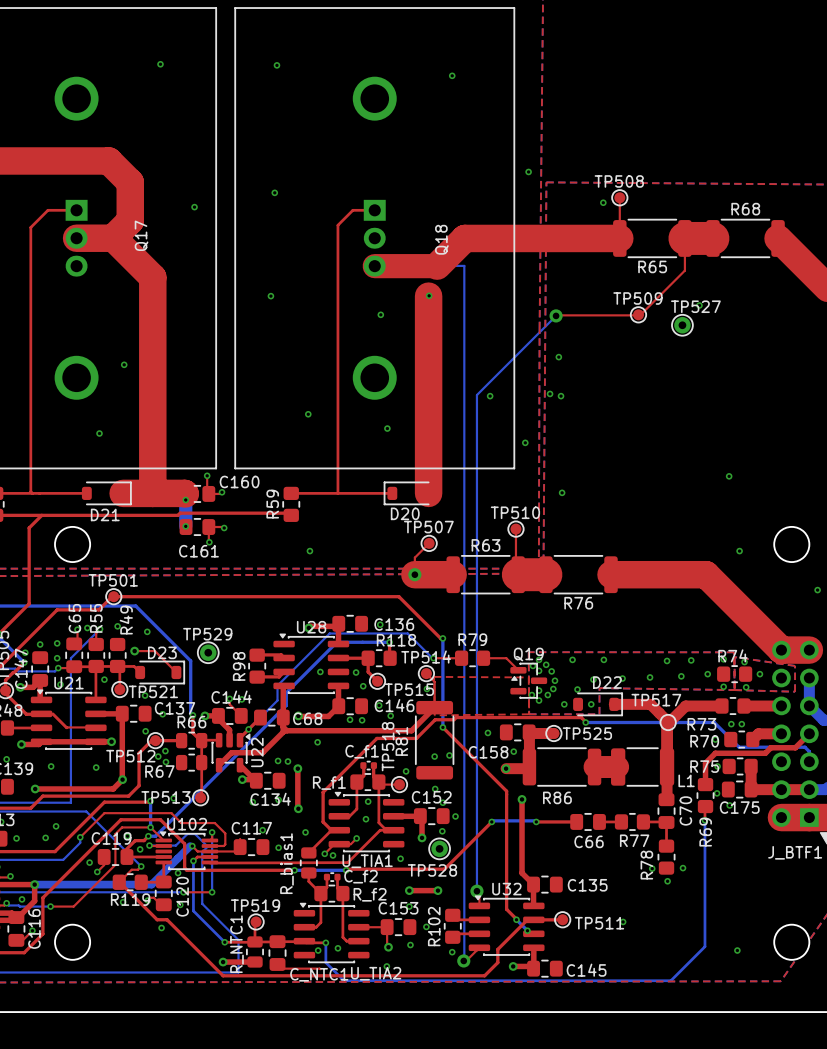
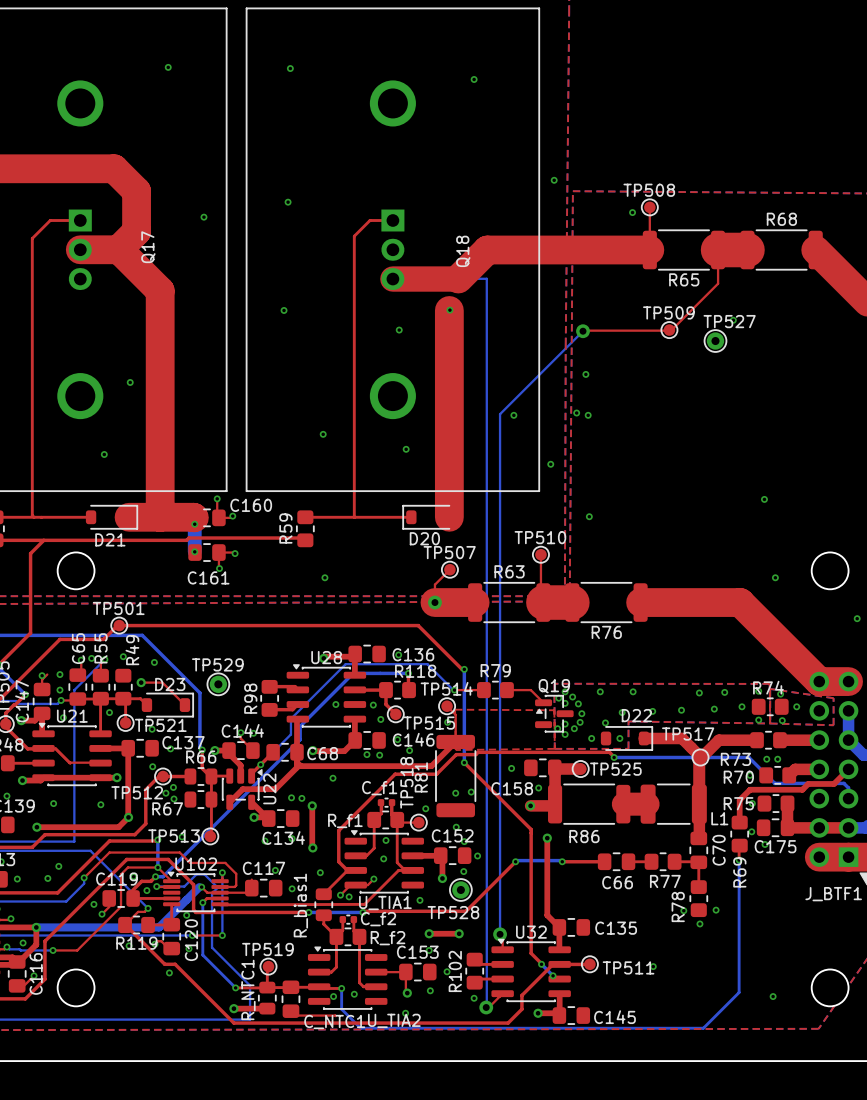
top track: none -> (47, 674) (42, 679) (42, 689)
via: (25, 652) -> none

